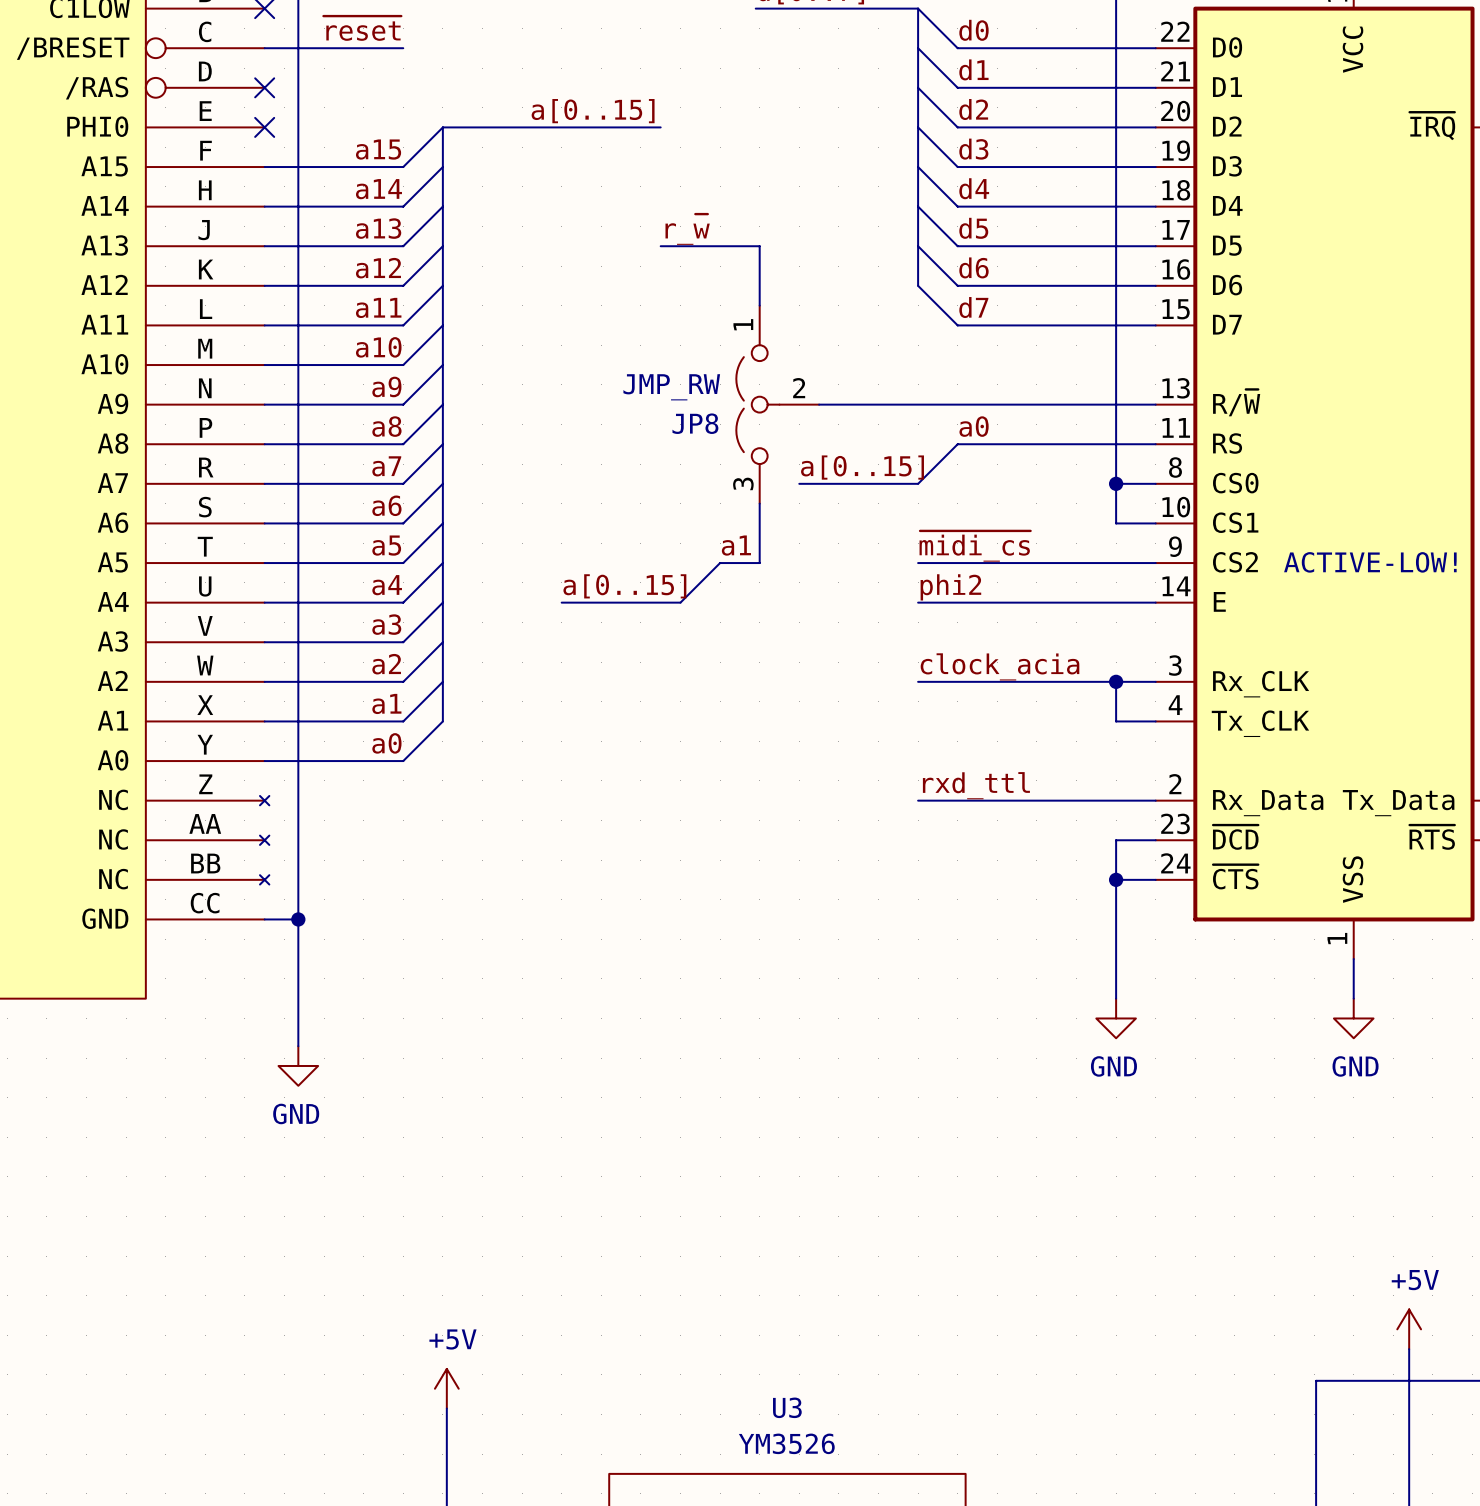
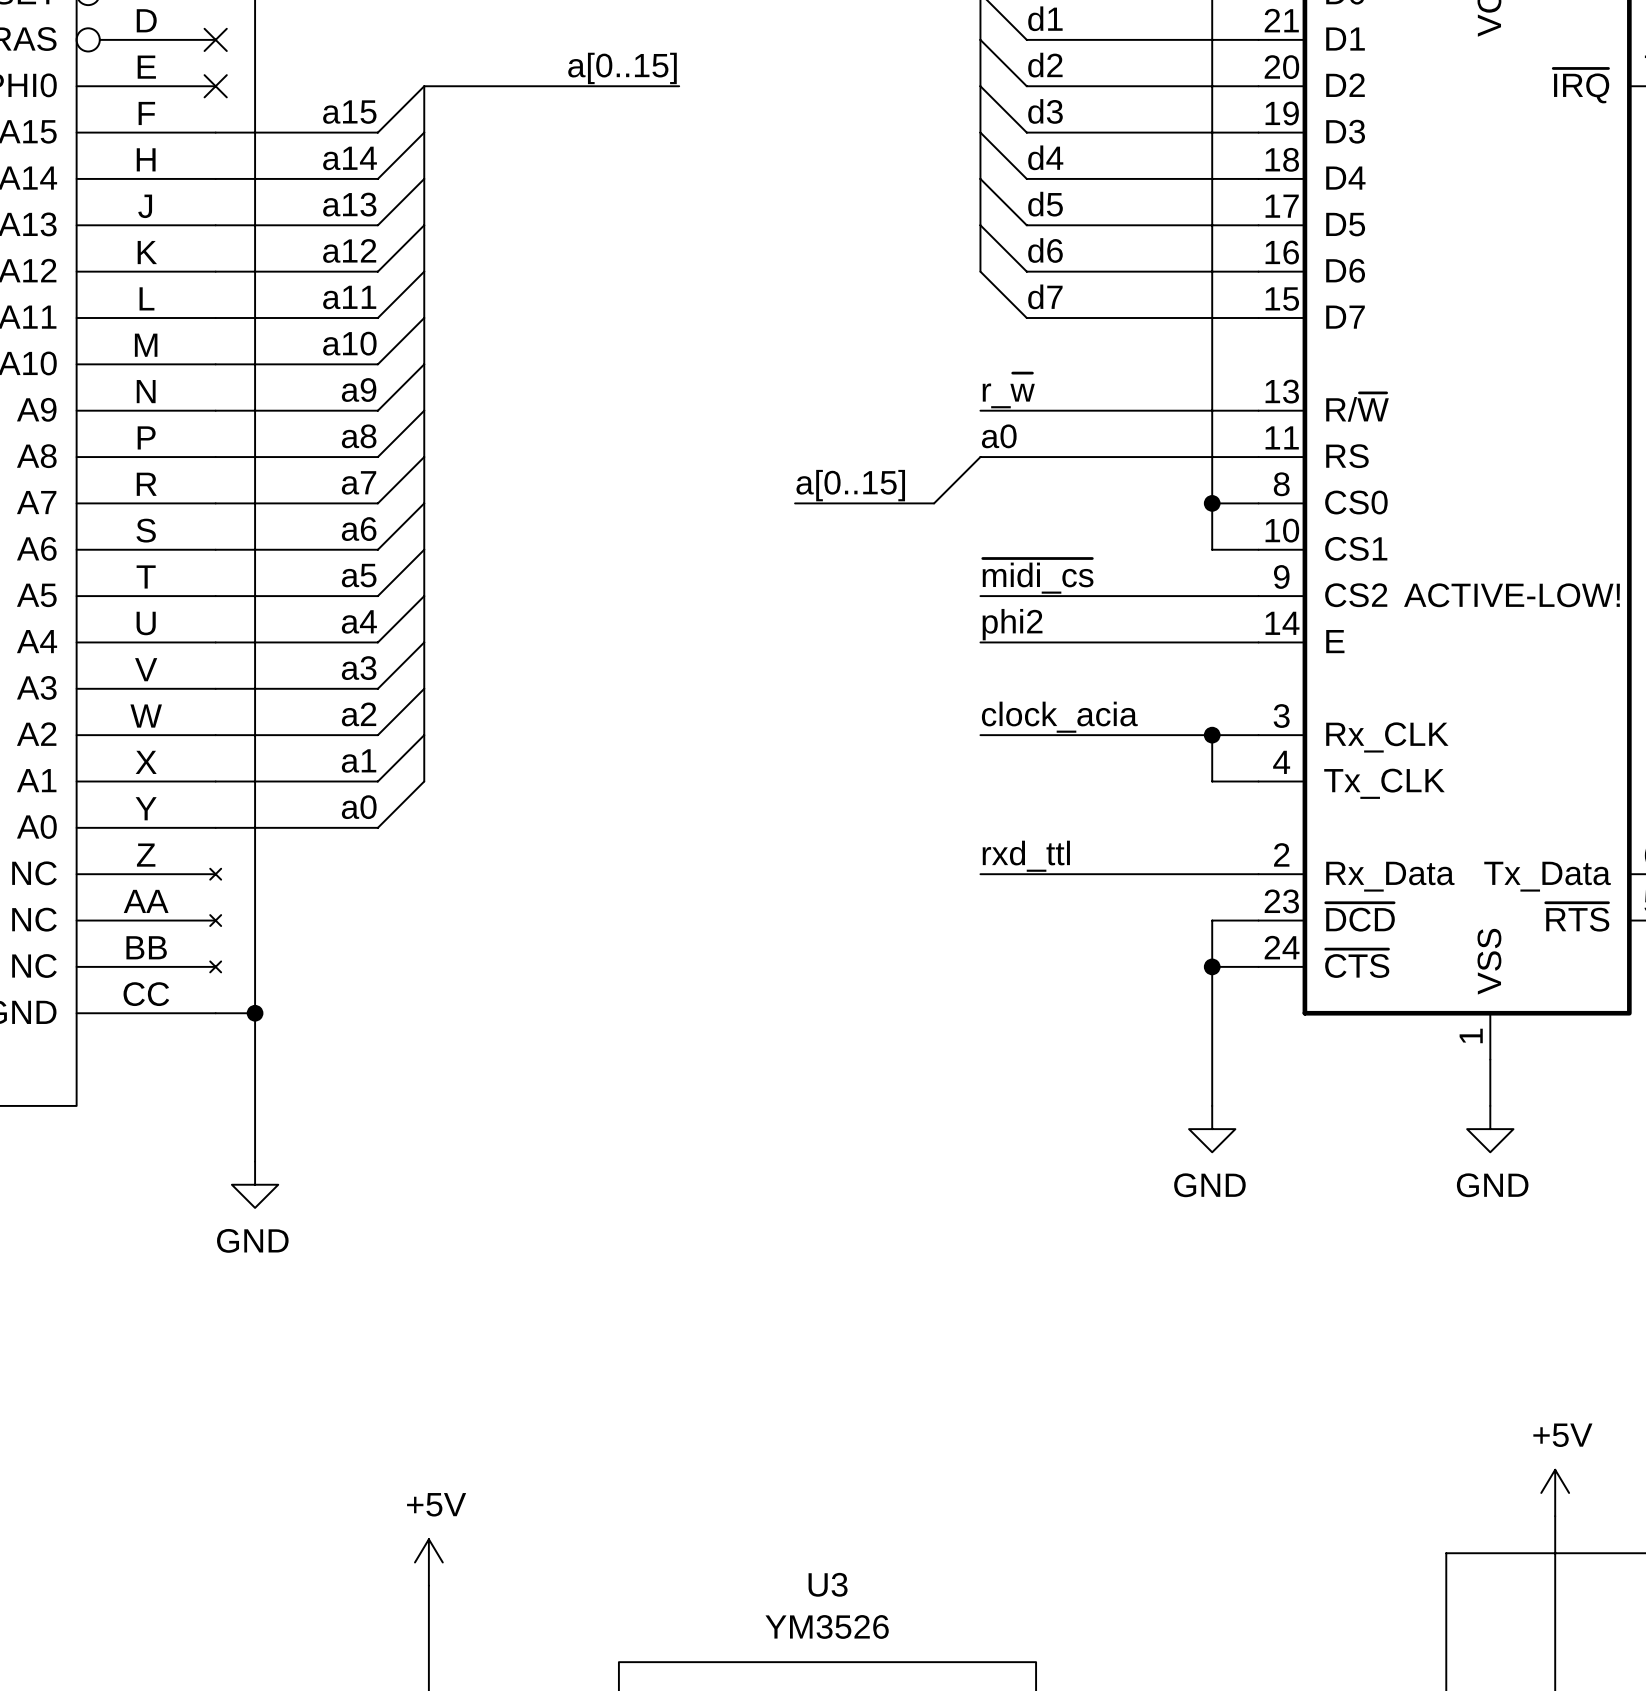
label position: r_~{w} (687, 229) -> r_~{w} (1008, 390)
wire: (660, 246) (759, 246) (759, 305) -> none
JP8: JMP_RW (777, 404) -> none
wire: (819, 404) (918, 404) -> none
label position: a0 (974, 426) -> a0 (999, 436)
wire: (957, 444) (918, 483) -> (1026, 457) (980, 457) (934, 503)
label position: a[0..15] (862, 467) -> a[0..15] (850, 485)
bus: (878, 483) (918, 483) -> (795, 503) (841, 503)
wire: (759, 503) (759, 563) (720, 563) (680, 602) -> none
label: a1 (736, 545) -> none
label: a[0..15] (624, 586) -> none
bus: (561, 602) (680, 602) -> none

